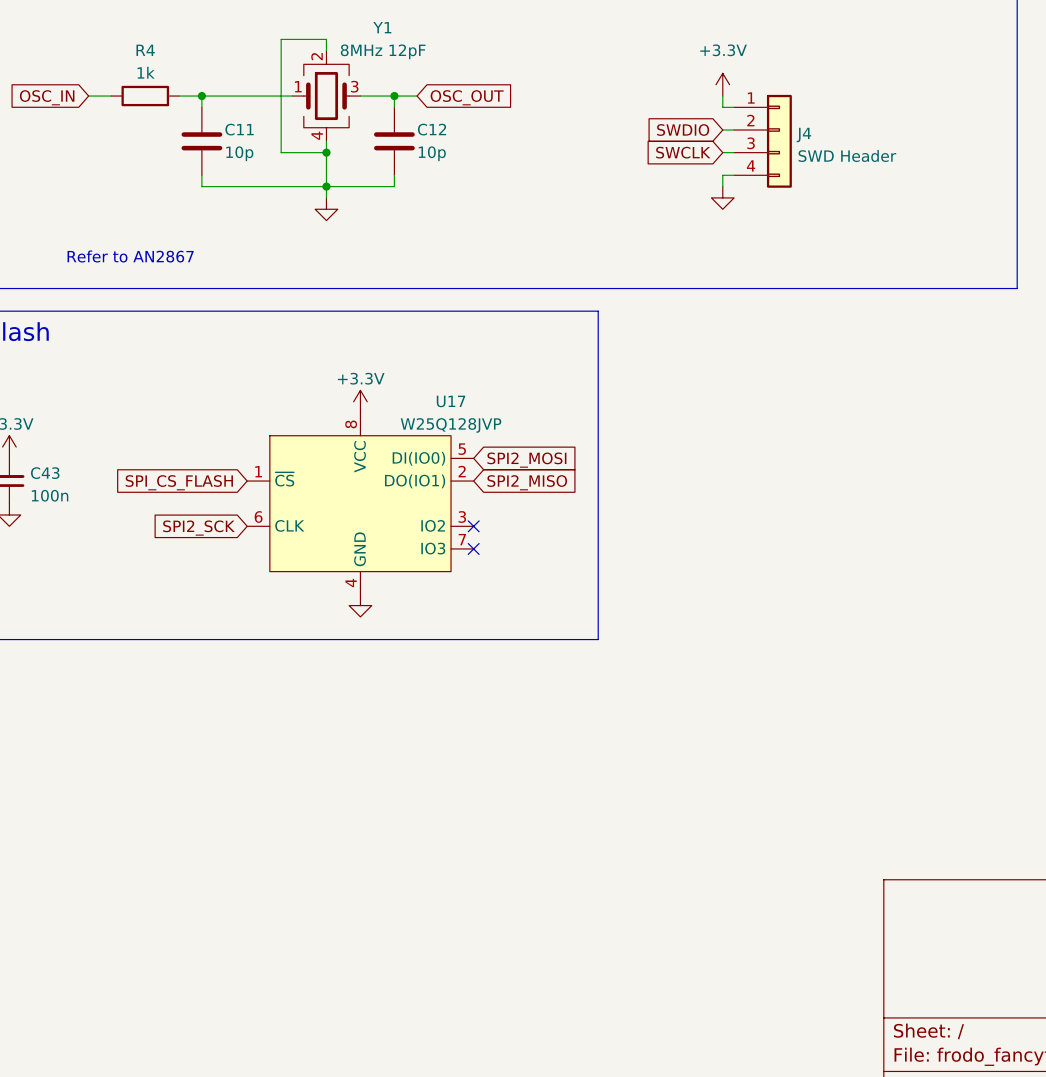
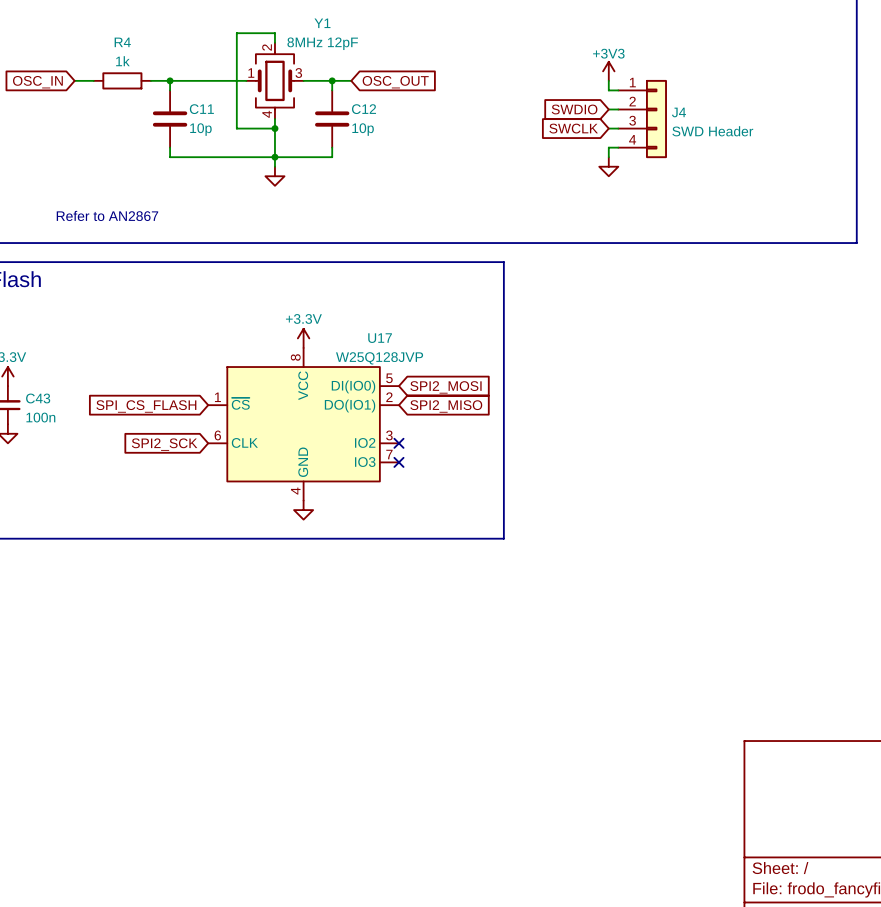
power symbol: +3.3V (722, 84) -> +3V3 (608, 71)

